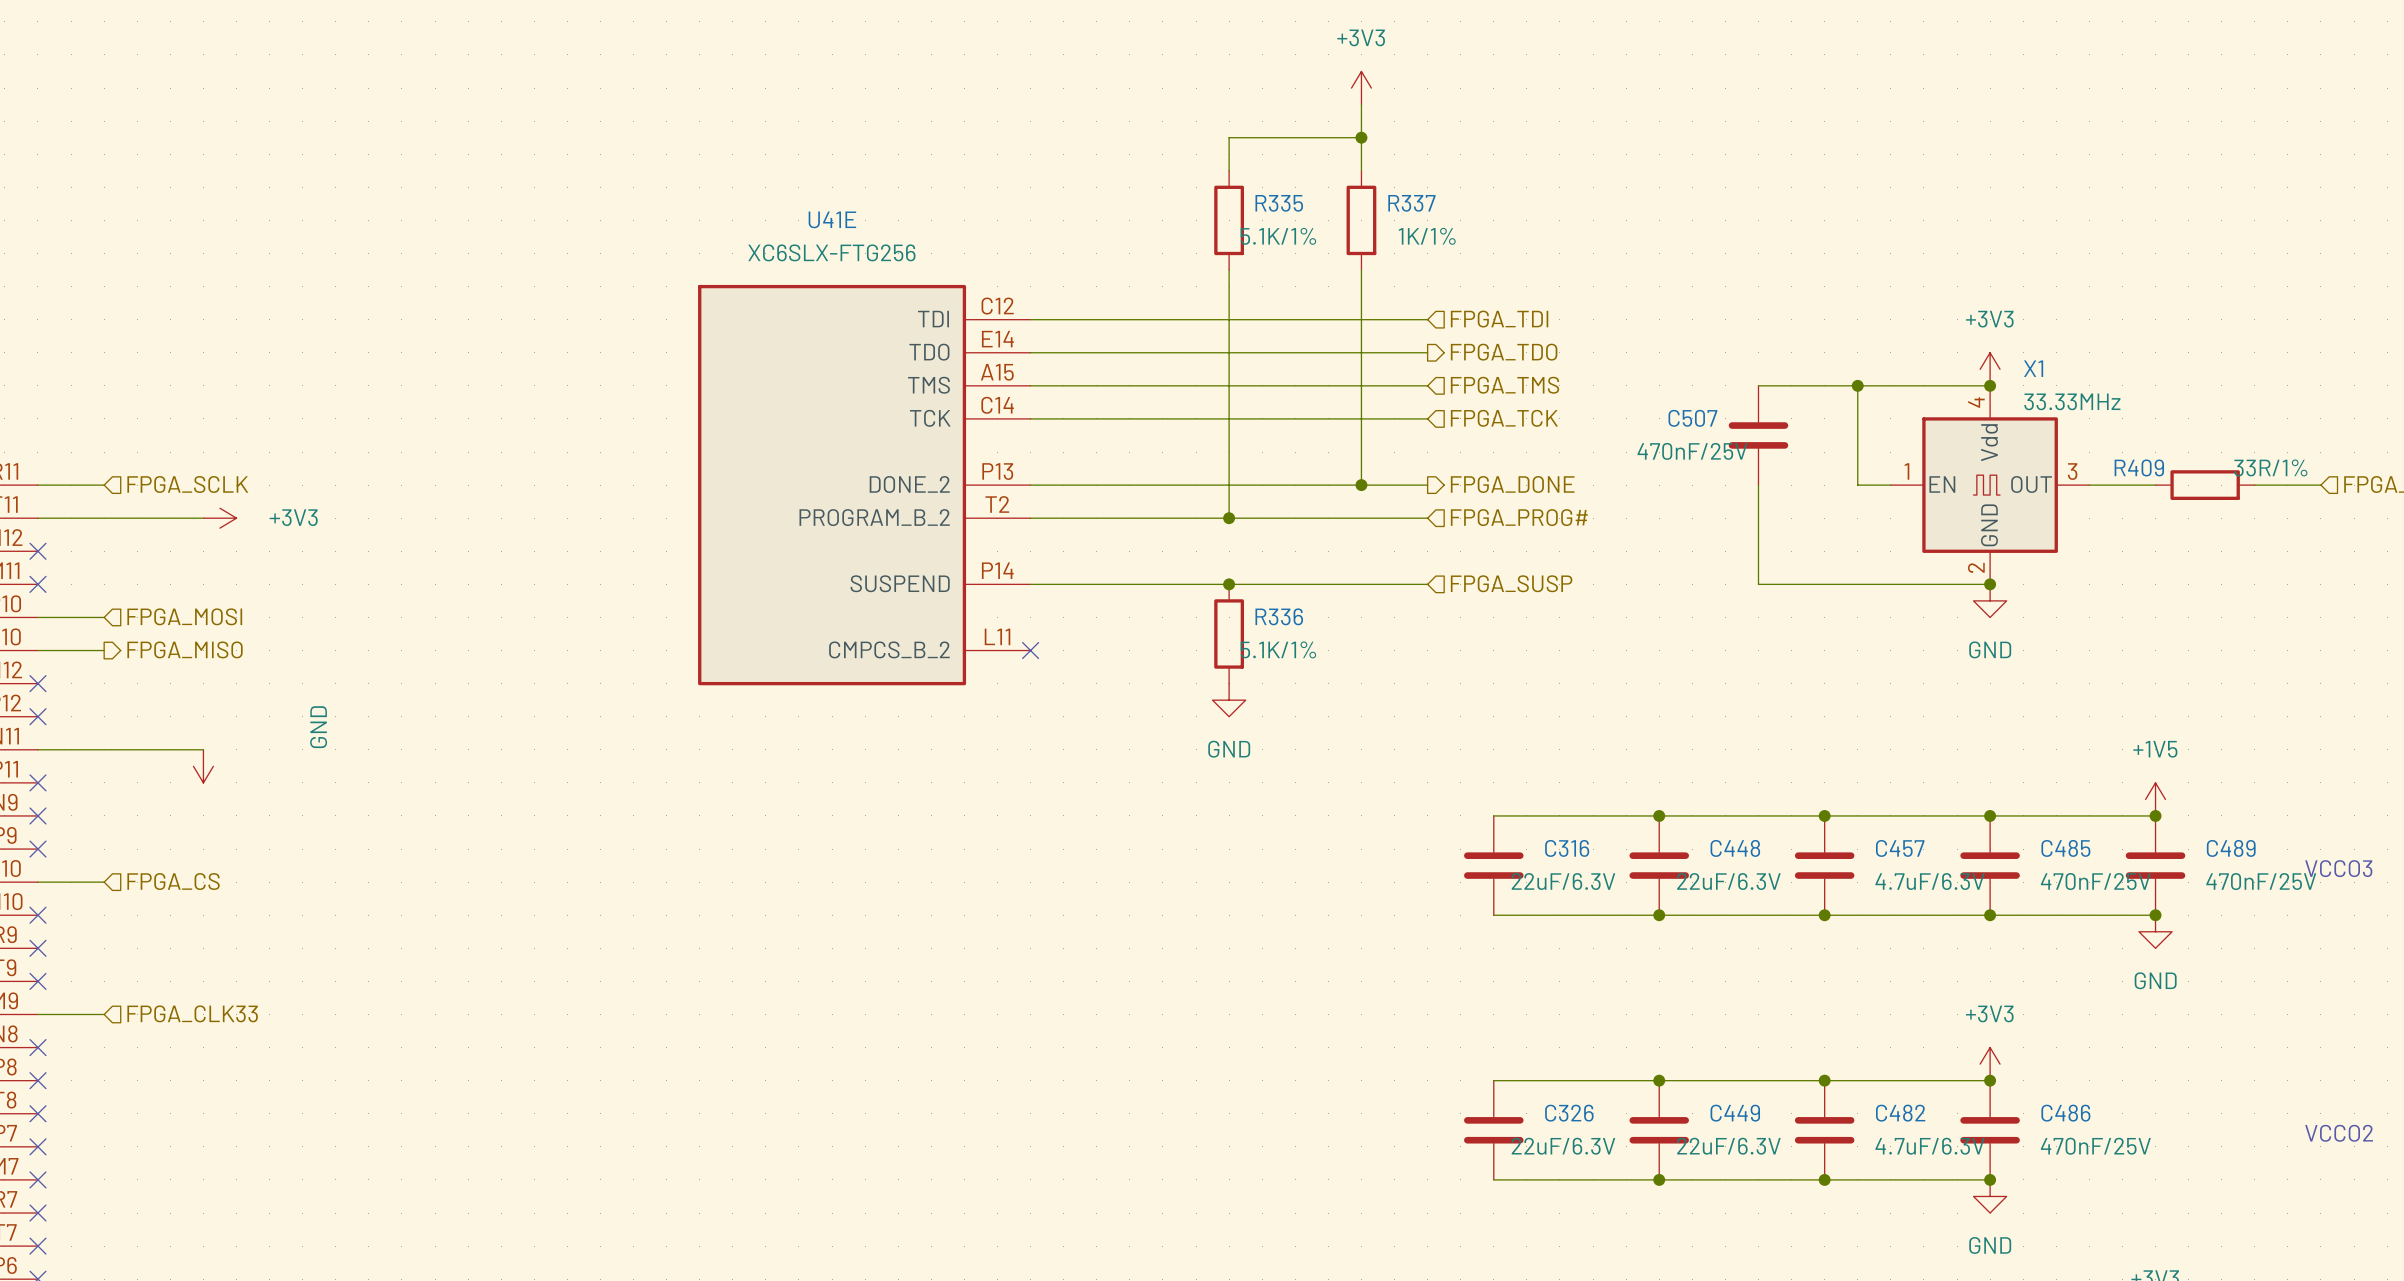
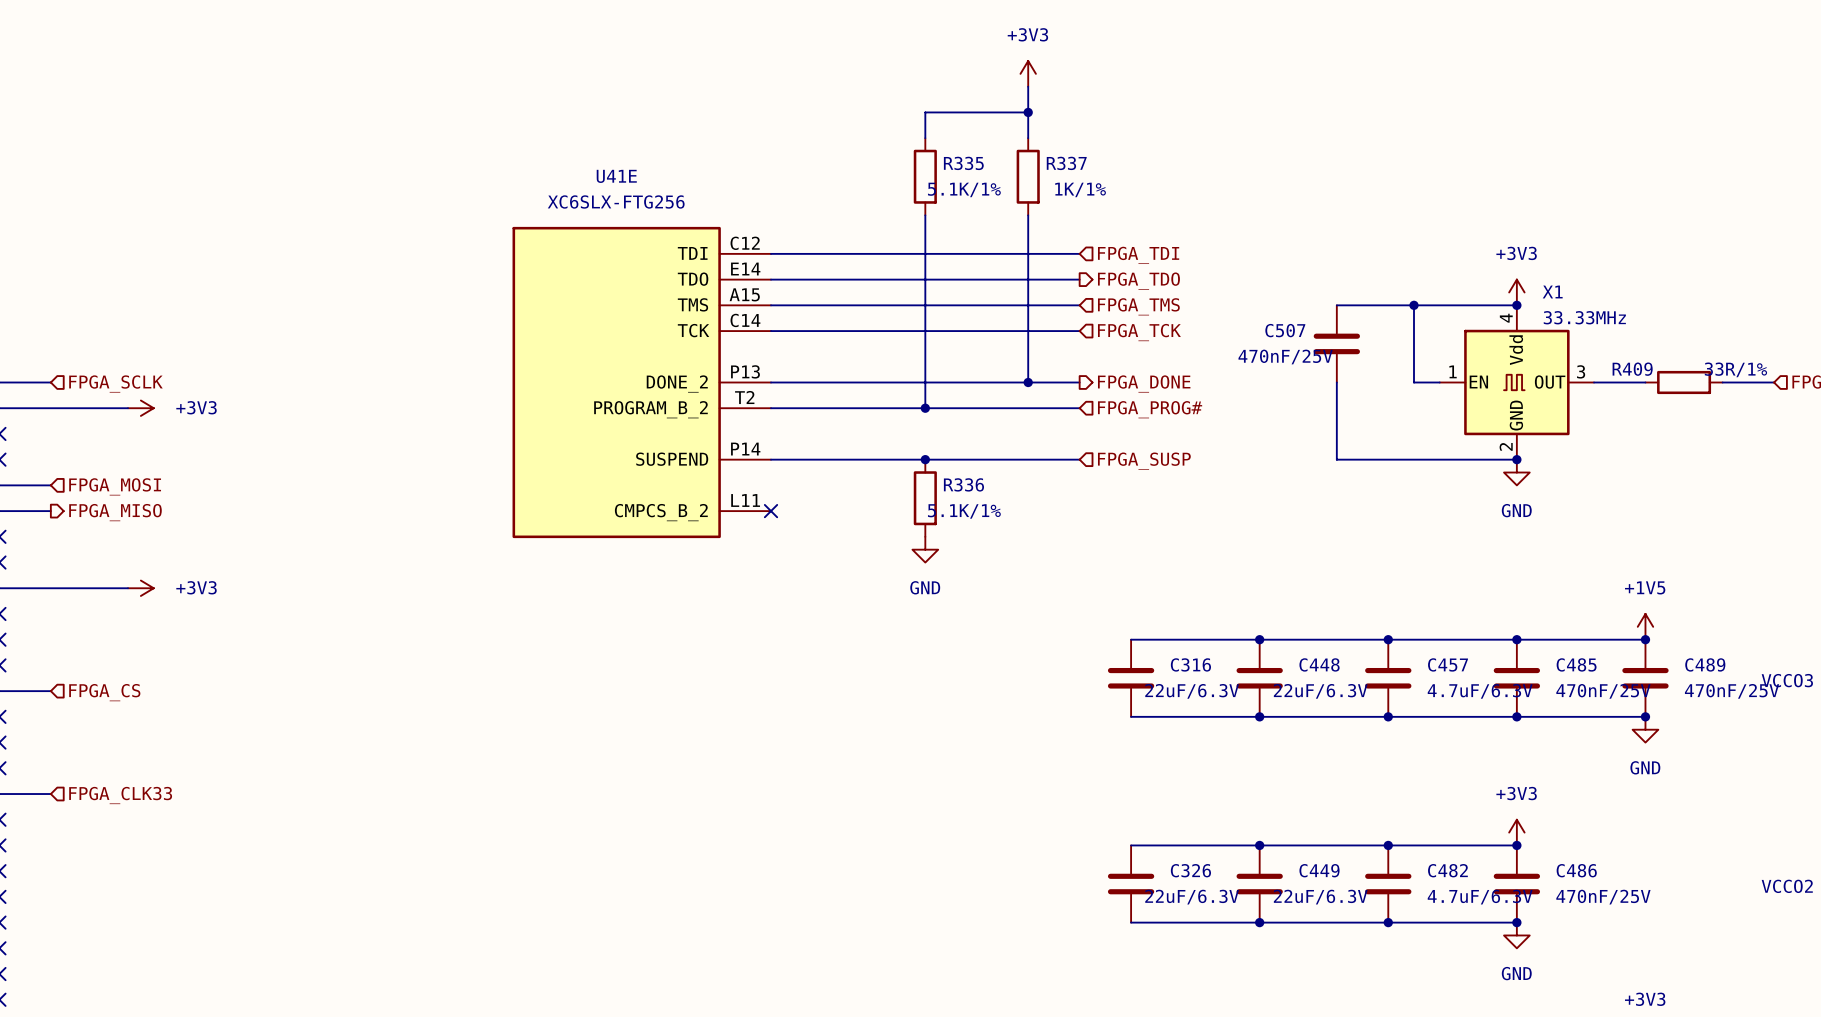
power symbol: none -> +3V3 (140, 588)
power symbol: GND (203, 766) -> none

